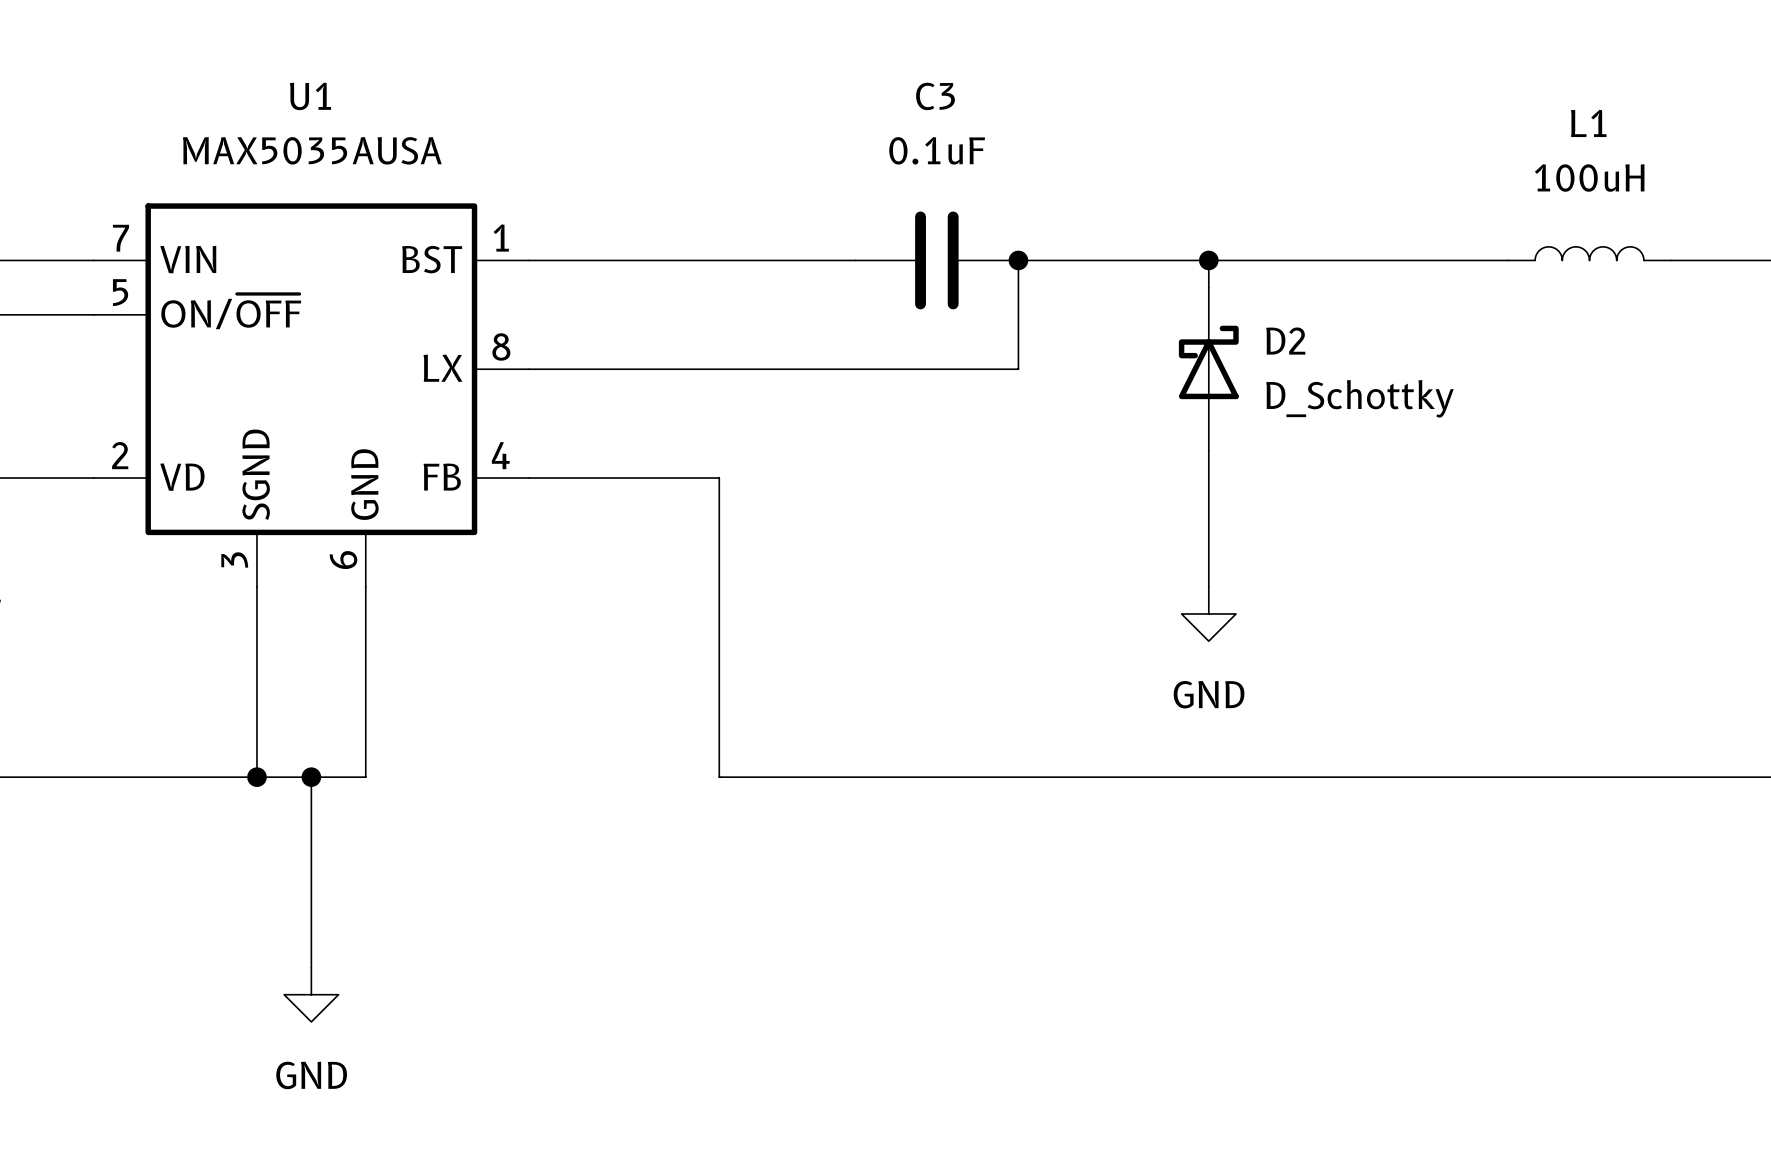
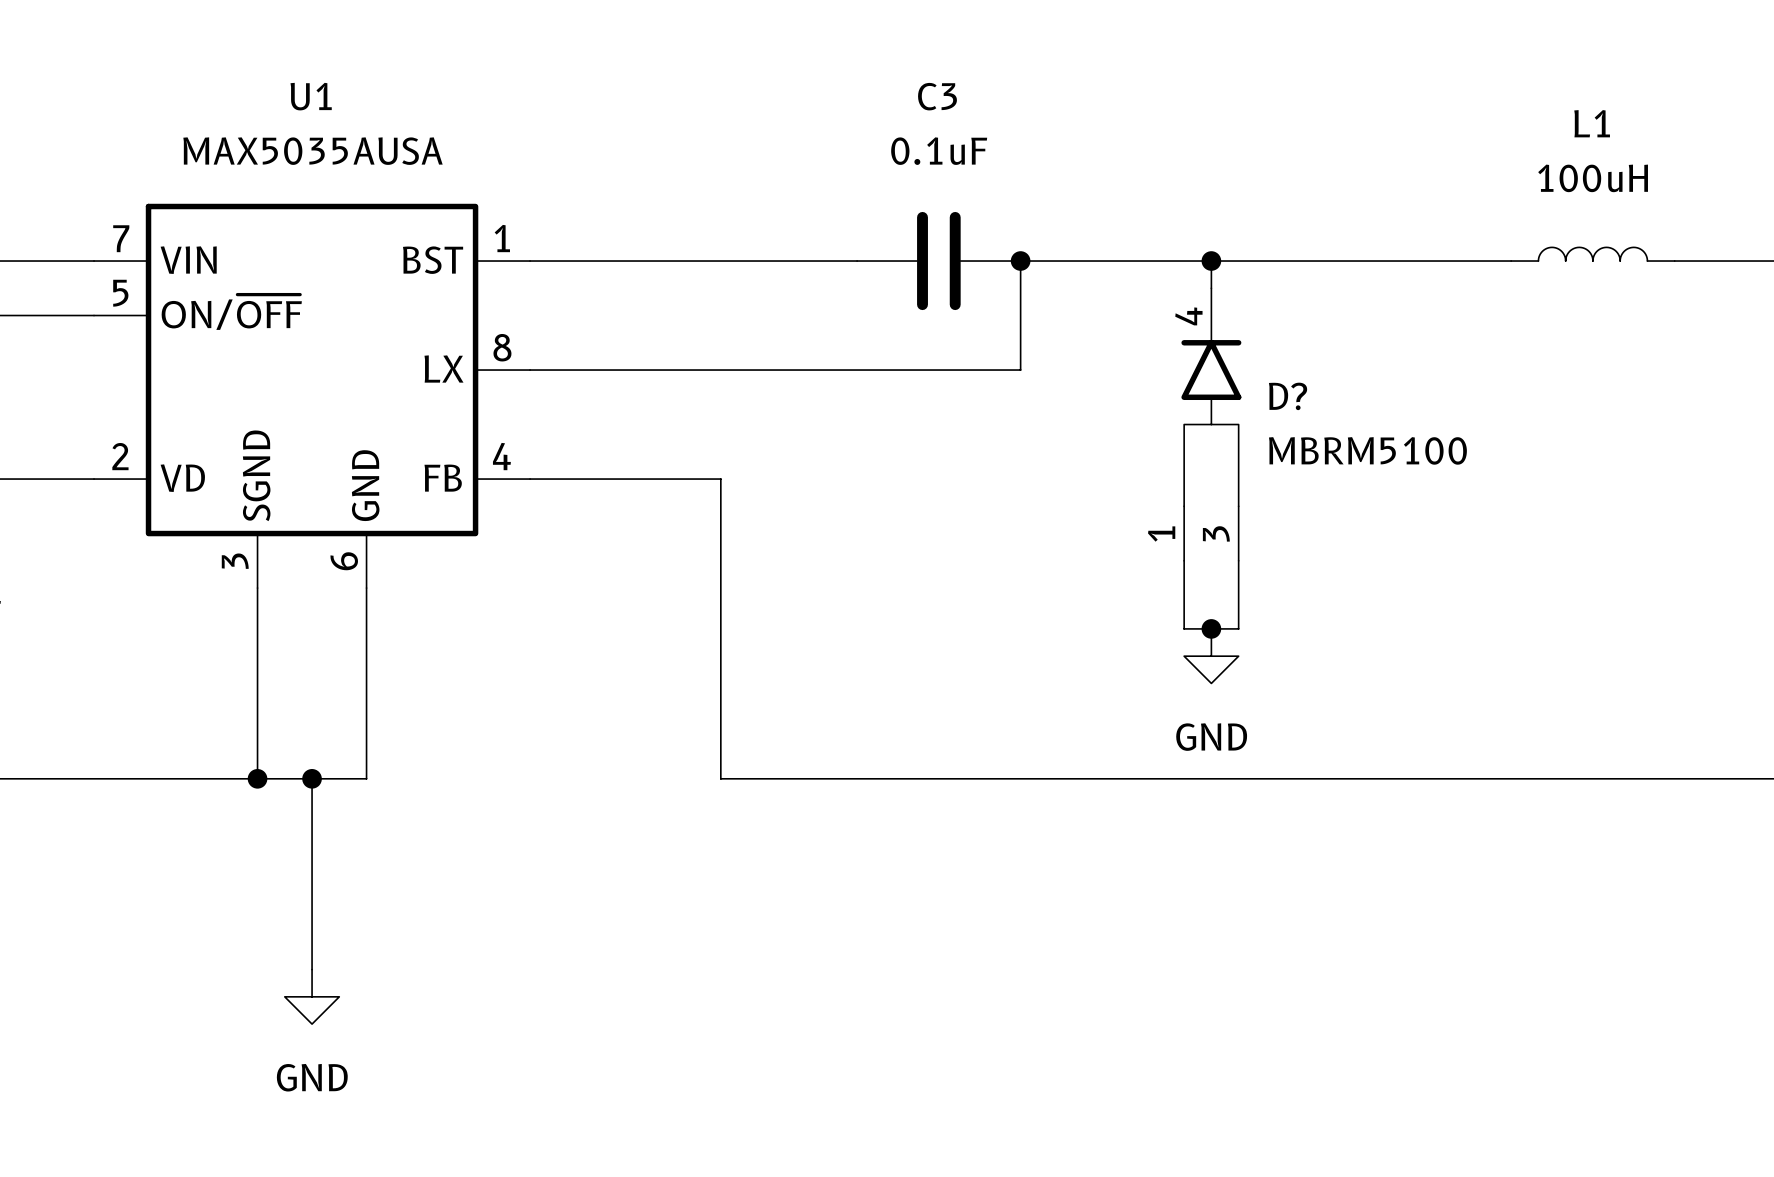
D2: D_Schottky (1208, 369) -> none
D?: none -> MBRM5100 (1211, 424)
wire: (1208, 450) (1208, 586) -> none
wire: none -> (1184, 560) (1184, 628) (1238, 628) (1238, 560)
power symbol position: GND (1208, 613) -> GND (1211, 656)
junction: none -> (1211, 628)

